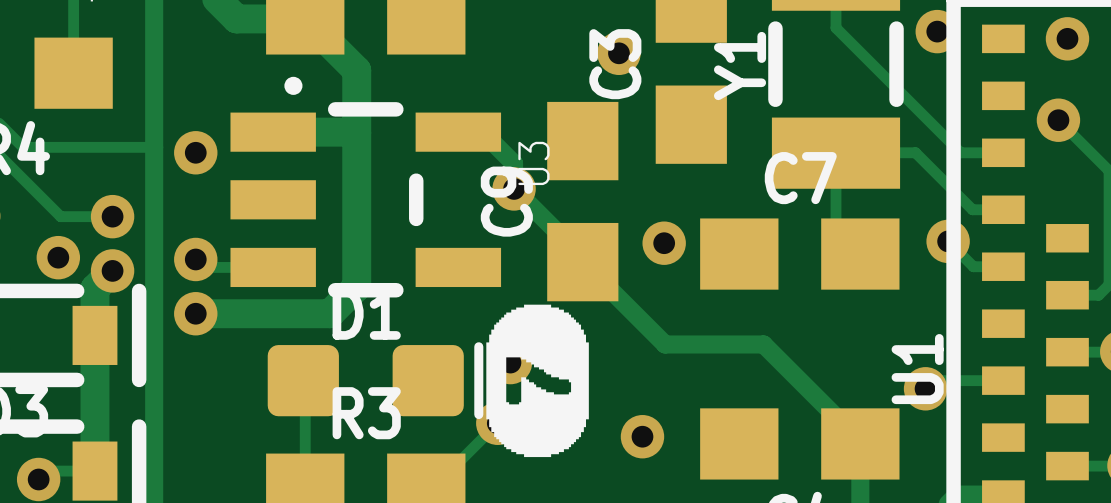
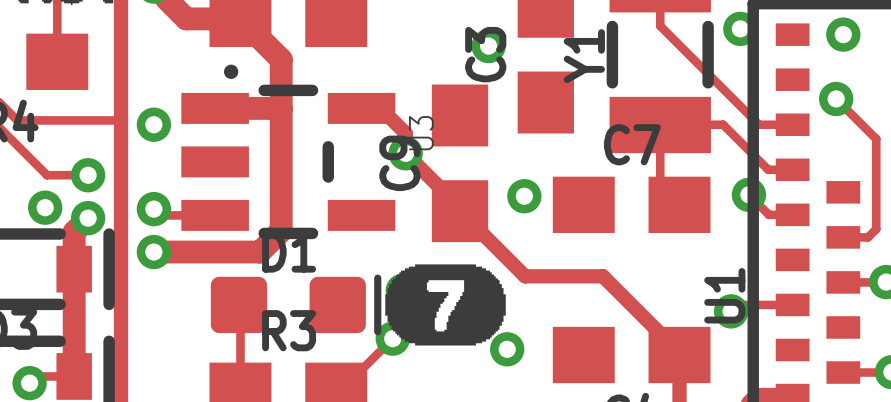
drawing shape: [486, 304, 589, 458] -> [385, 264, 506, 346]

